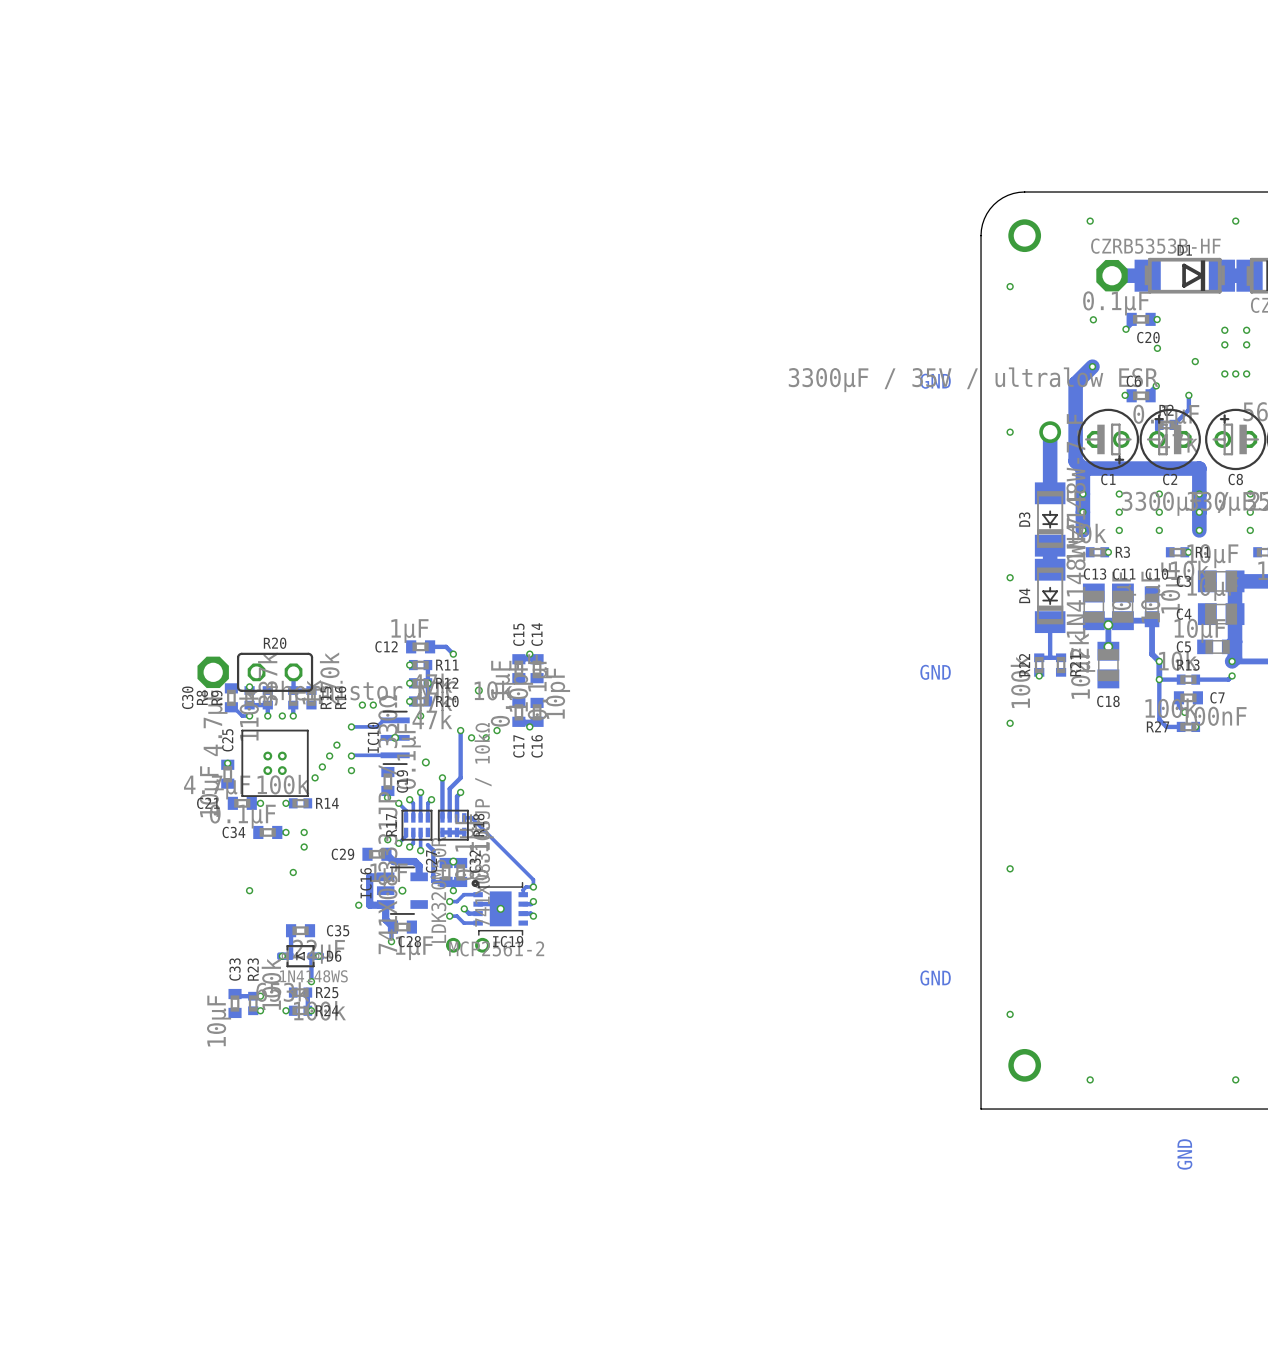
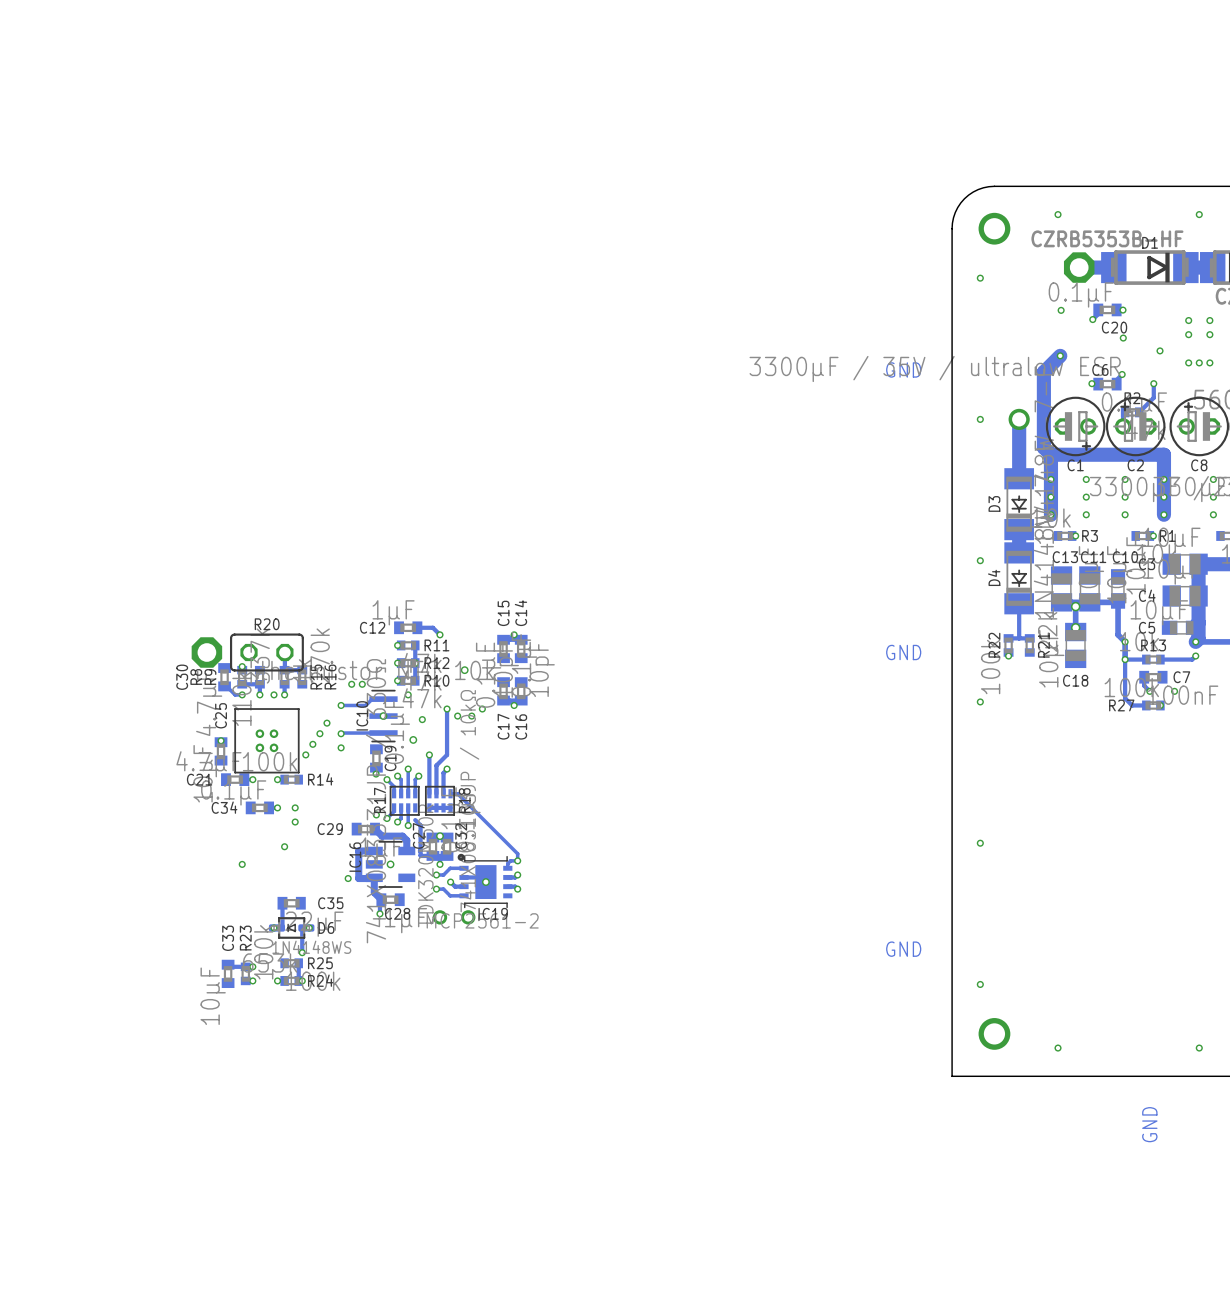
via: none -> (1174, 691)
via: none -> (422, 719)

